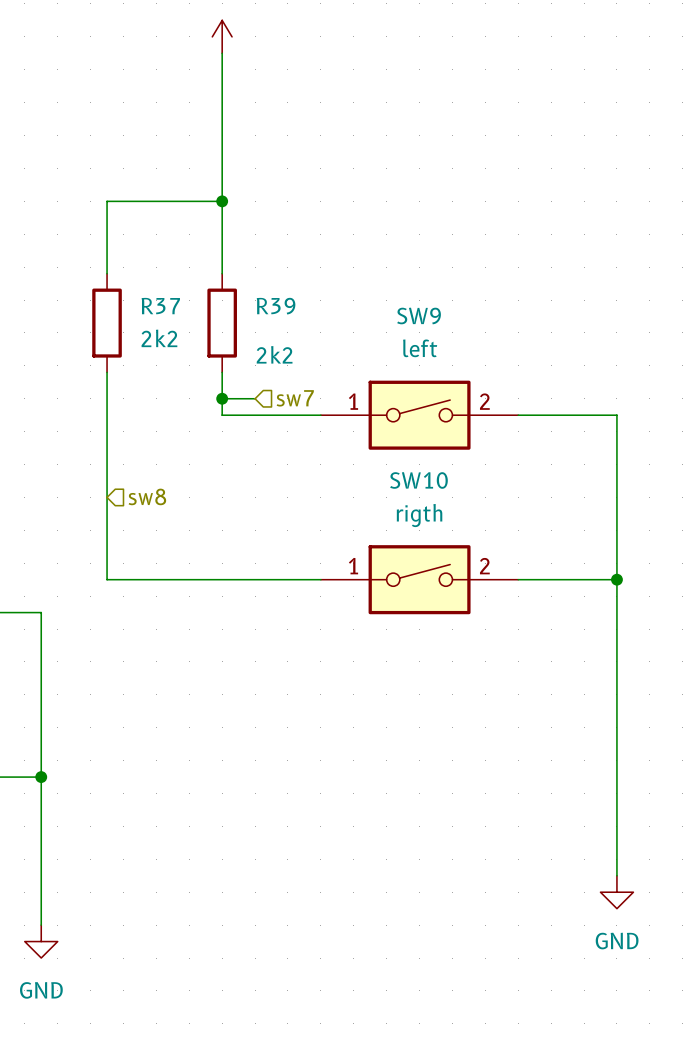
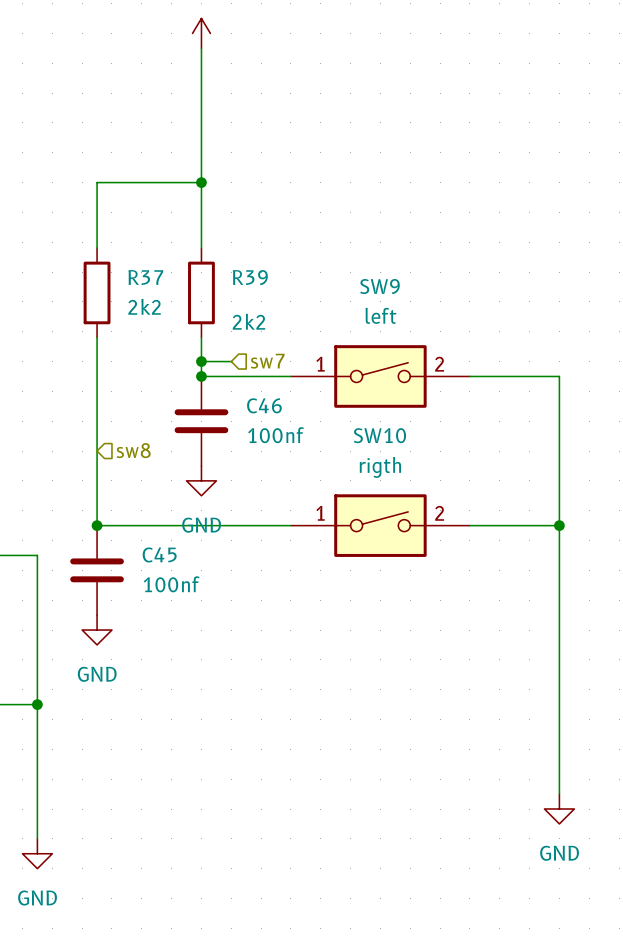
junction: none -> (201, 376)
C46: none -> 100nf (201, 421)
power symbol: none -> GND (201, 480)
junction: none -> (97, 525)
C45: none -> 100nf (97, 570)
power symbol: none -> GND (97, 630)

